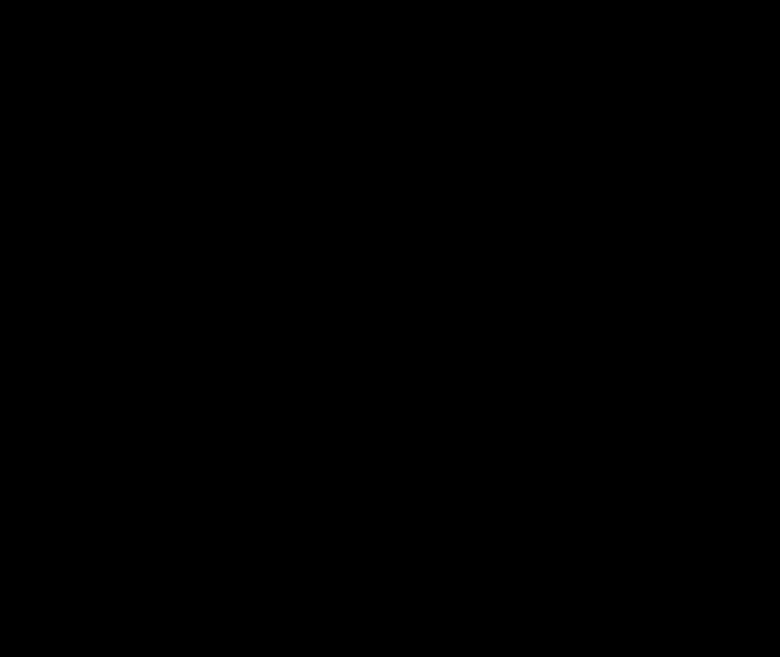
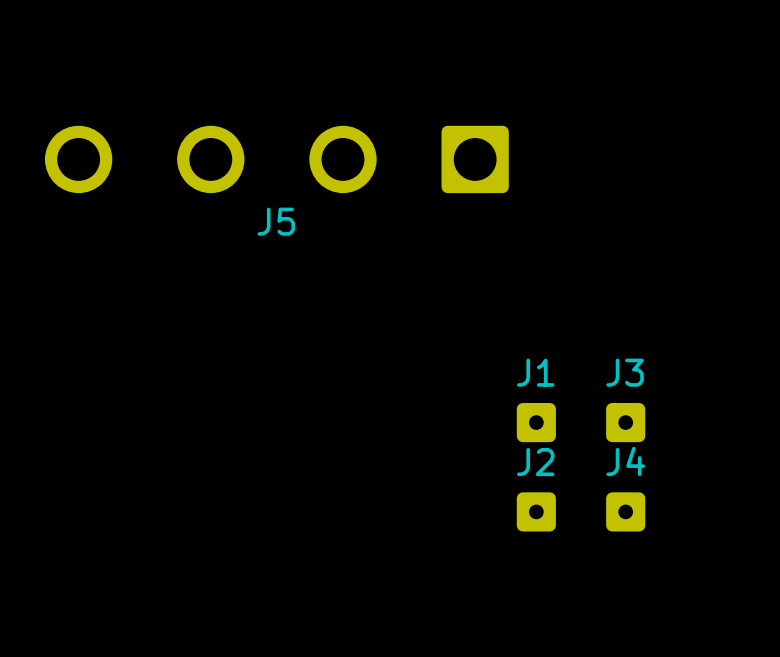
J5: none -> (276, 159)
J1: none -> (536, 422)
J3: none -> (625, 422)
J2: none -> (536, 511)
J4: none -> (625, 511)

